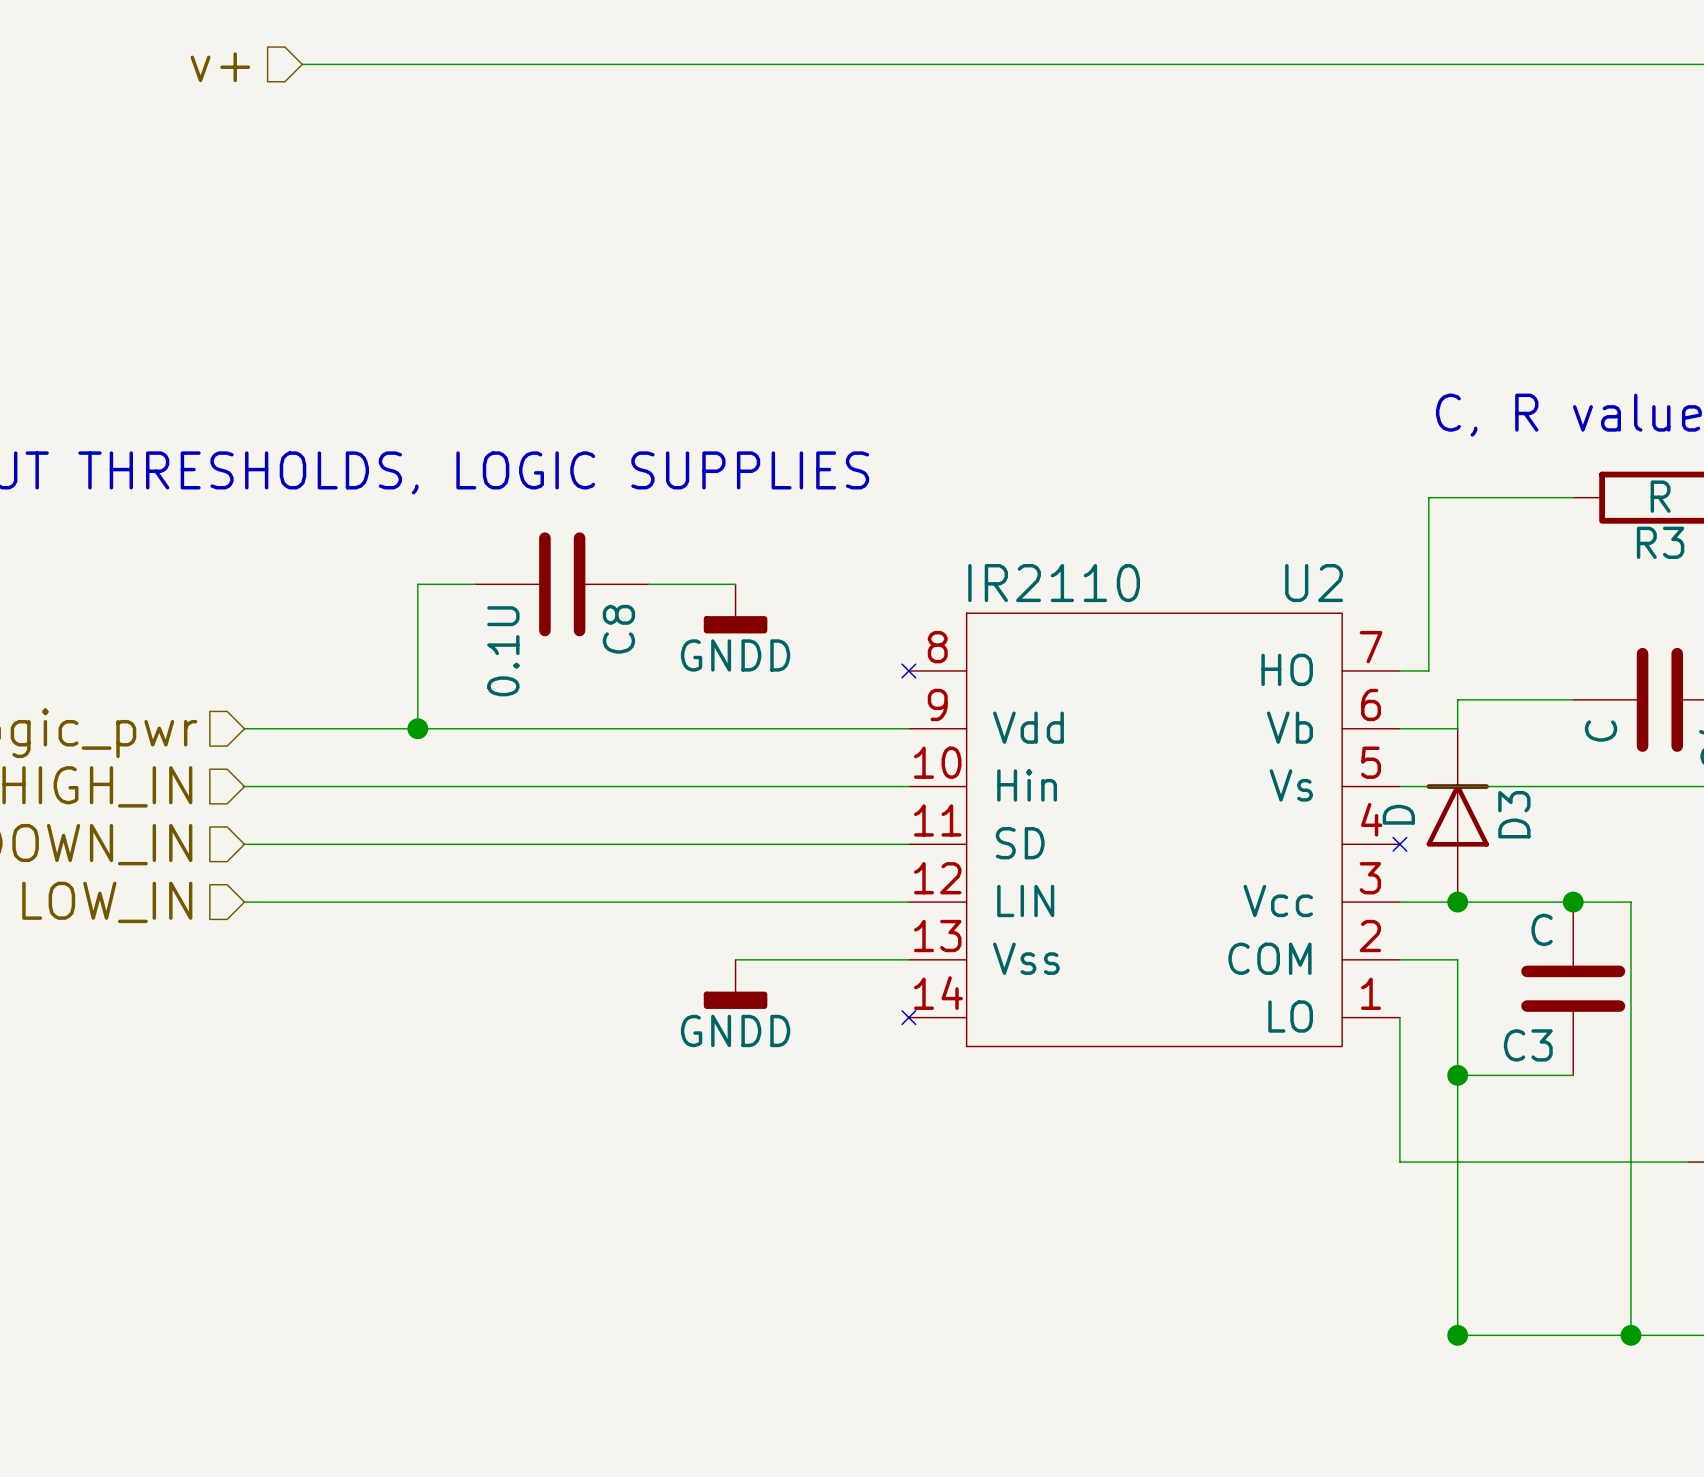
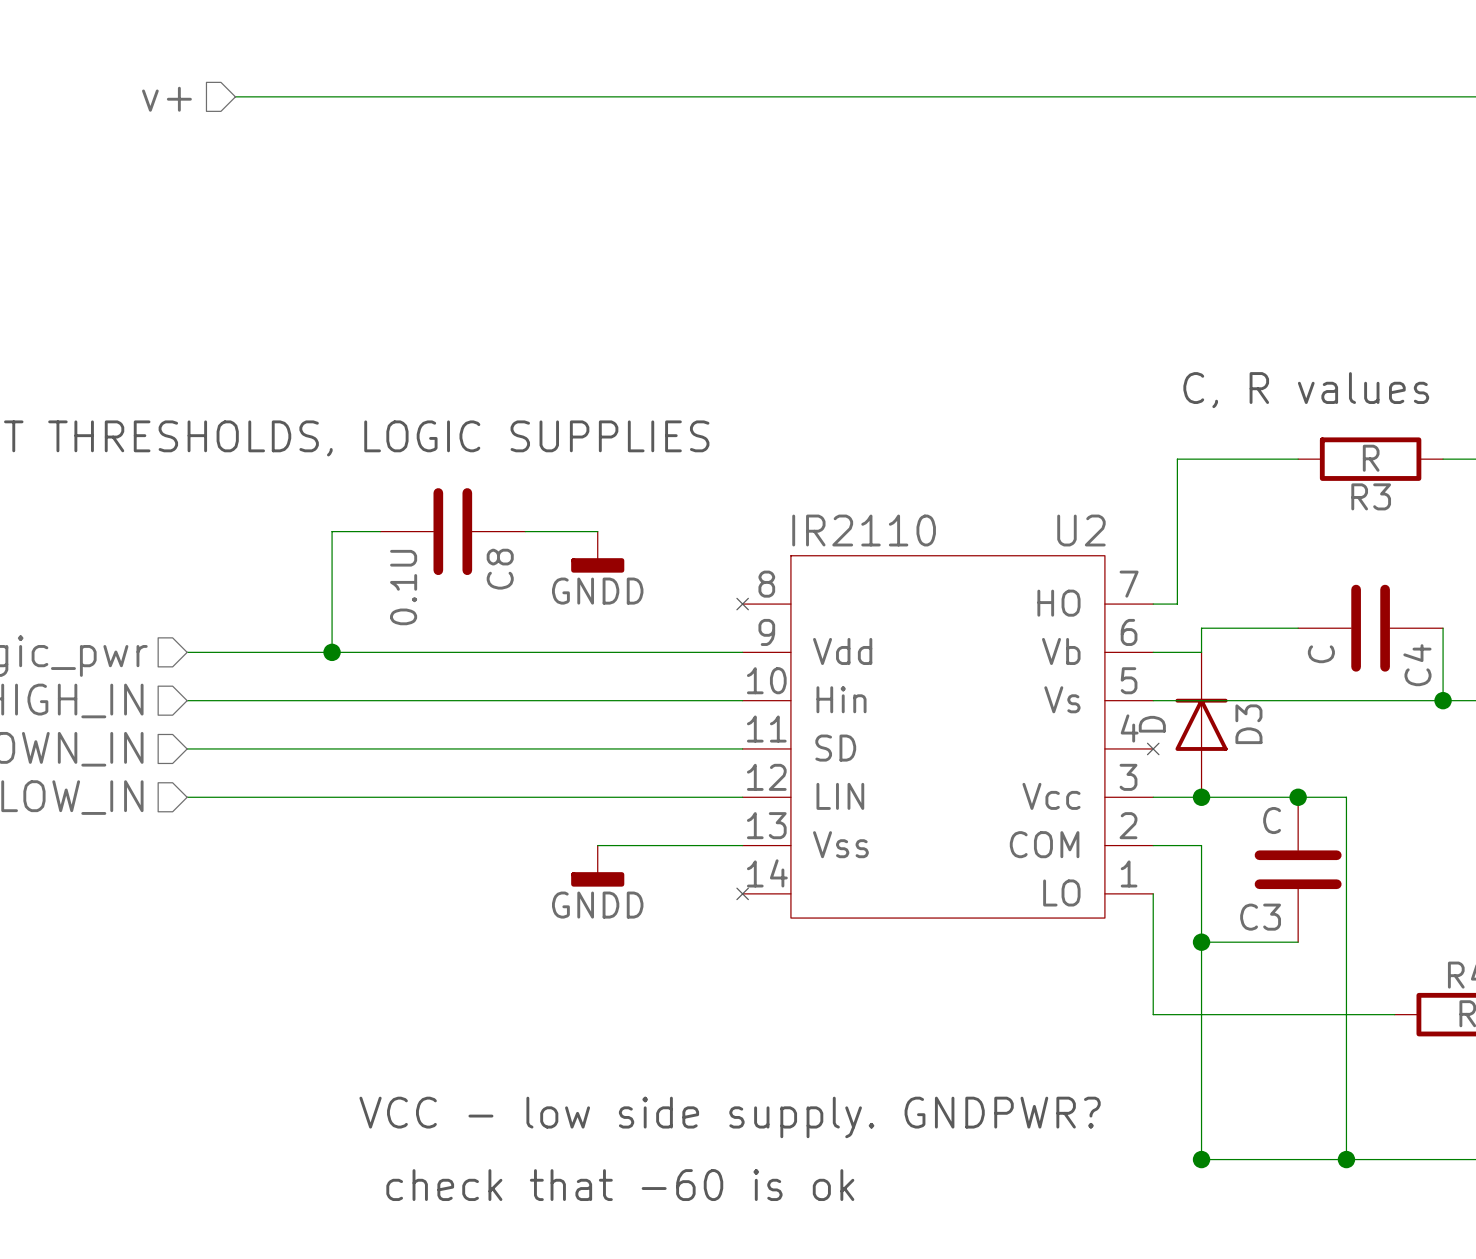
text: none -> VCC - low side supply. GNDPWR? (730, 1117)
text: none -> check that -60 is ok (620, 1185)

